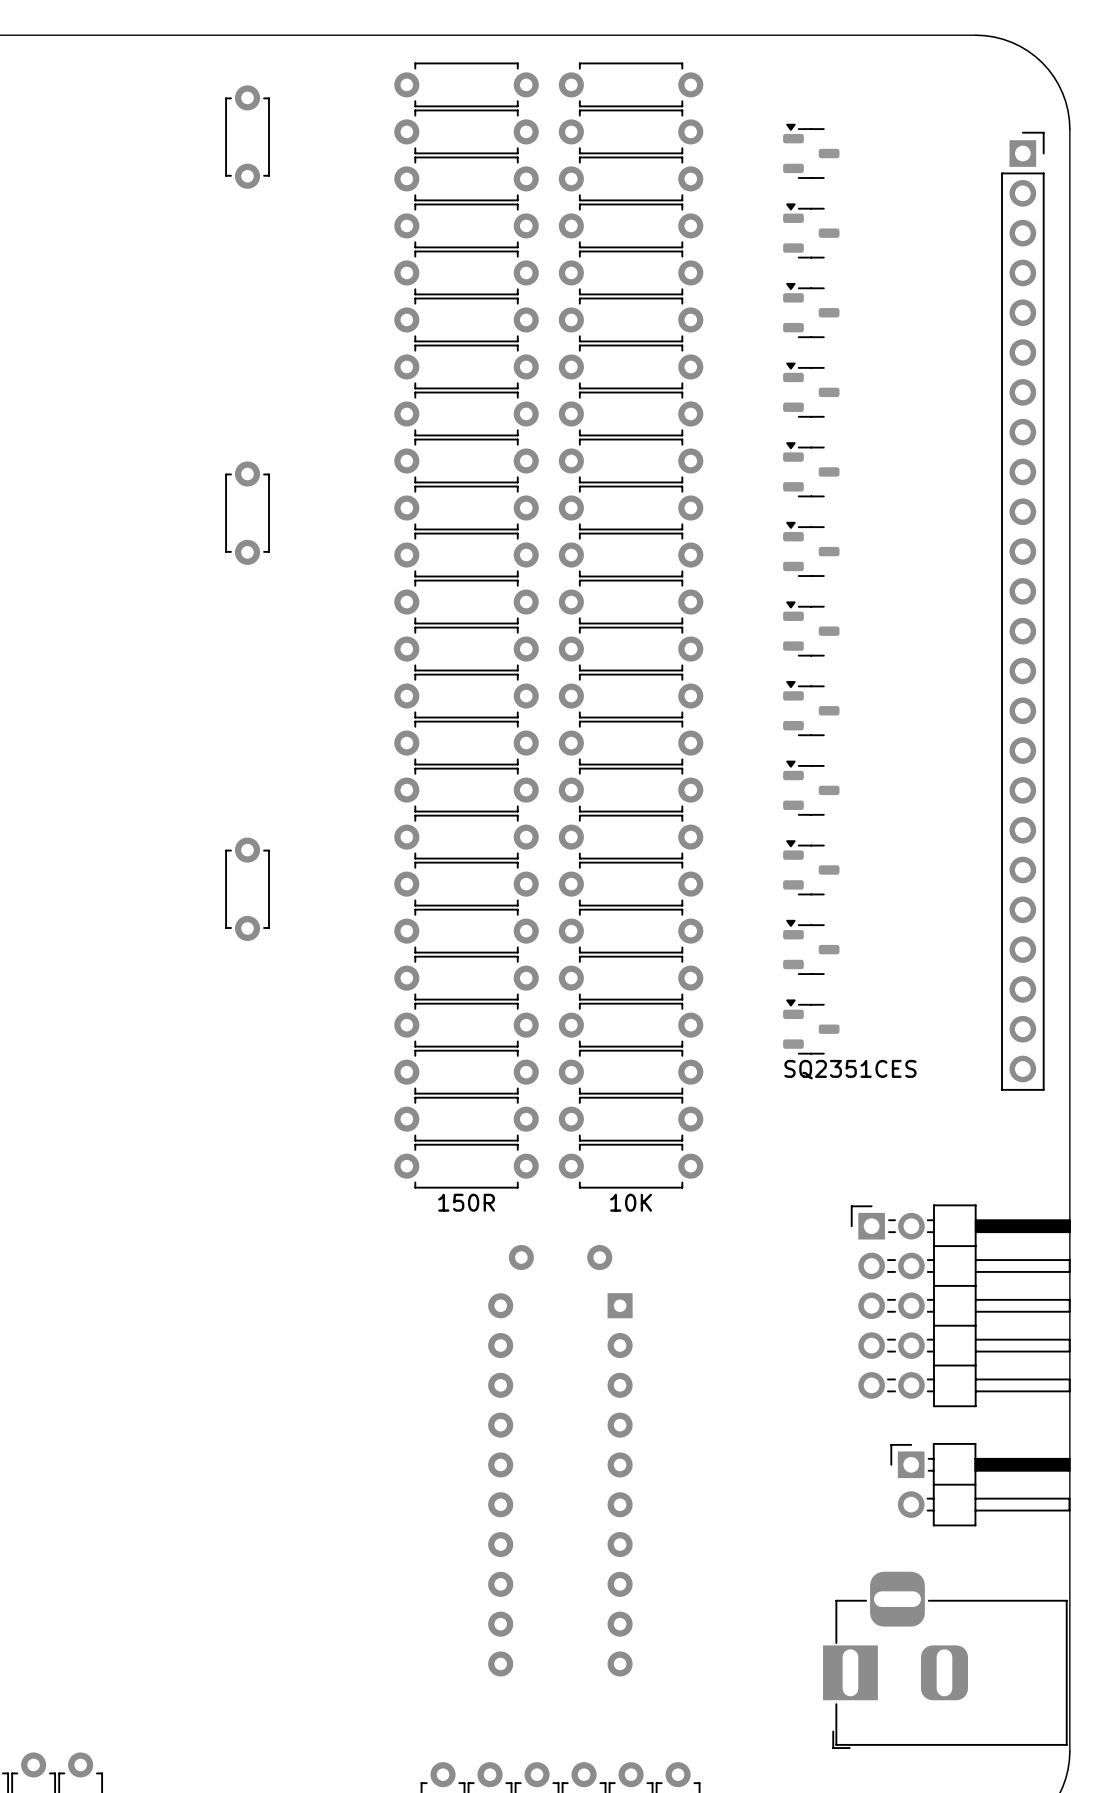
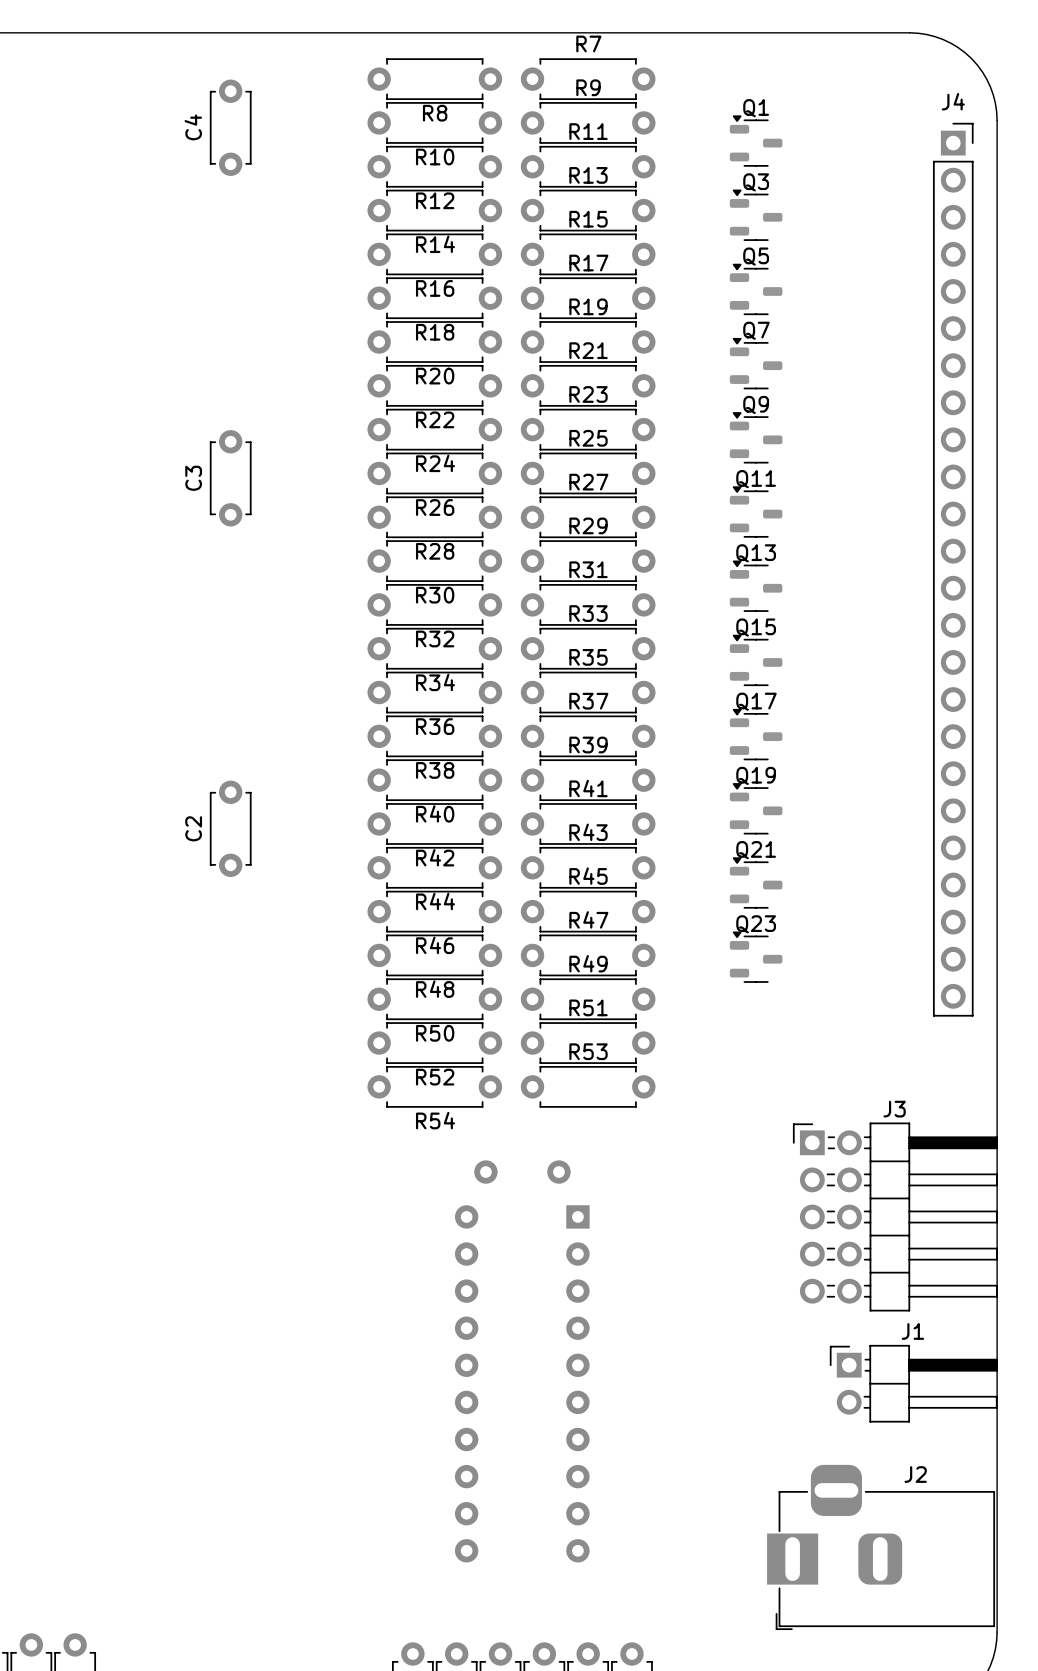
R7 name: none -> R7 (588, 43)
R9 name: none -> R9 (588, 87)
J4 name: none -> J4 (953, 101)
Q1 name: none -> Q1 (756, 108)
R8 name: none -> R8 (435, 113)
C4 name: none -> C4 (193, 127)
R11 name: none -> R11 (588, 131)
R10 name: none -> R10 (435, 157)
R13 name: none -> R13 (588, 175)
Q3 name: none -> Q3 (756, 182)
R12 name: none -> R12 (435, 200)
R15 name: none -> R15 (588, 219)
R14 name: none -> R14 (435, 244)
Q5 name: none -> Q5 (756, 256)
R17 name: none -> R17 (588, 263)
R16 name: none -> R16 (435, 288)
R19 name: none -> R19 (588, 306)
Q7 name: none -> Q7 (756, 330)
R18 name: none -> R18 (435, 332)
R21 name: none -> R21 (588, 350)
R20 name: none -> R20 (435, 376)
R23 name: none -> R23 (588, 394)
Q9 name: none -> Q9 (756, 404)
R22 name: none -> R22 (435, 419)
R25 name: none -> R25 (588, 438)
R24 name: none -> R24 (435, 463)
C3 name: none -> C3 (193, 478)
Q11 name: none -> Q11 (756, 479)
R27 name: none -> R27 (588, 482)
R26 name: none -> R26 (435, 507)
R29 name: none -> R29 (588, 525)
R28 name: none -> R28 (435, 551)
Q13 name: none -> Q13 (756, 553)
R31 name: none -> R31 (588, 569)
R30 name: none -> R30 (435, 595)
R33 name: none -> R33 (588, 613)
Q15 name: none -> Q15 (756, 627)
R32 name: none -> R32 (435, 638)
R35 name: none -> R35 (588, 657)
R34 name: none -> R34 (435, 682)
R37 name: none -> R37 (588, 701)
Q17 name: none -> Q17 (756, 701)
R36 name: none -> R36 (435, 726)
R39 name: none -> R39 (588, 745)
R38 name: none -> R38 (435, 770)
Q19 name: none -> Q19 (756, 775)
R41 name: none -> R41 (588, 788)
R40 name: none -> R40 (435, 813)
C2 name: none -> C2 (193, 828)
R43 name: none -> R43 (588, 832)
Q21 name: none -> Q21 (756, 850)
R42 name: none -> R42 (435, 857)
R45 name: none -> R45 (588, 876)
R44 name: none -> R44 (435, 901)
R47 name: none -> R47 (588, 919)
Q23 name: none -> Q23 (756, 924)
R46 name: none -> R46 (435, 945)
R49 name: none -> R49 (588, 963)
R48 name: none -> R48 (435, 989)
Q23 value: SQ2351CES (850, 1069) -> none
R51 name: none -> R51 (588, 1007)
R50 name: none -> R50 (435, 1033)
R53 name: none -> R53 (588, 1051)
R52 name: none -> R52 (435, 1077)
J3 name: none -> J3 (894, 1109)
R54 value: 150R (466, 1202) -> none
R54 name: none -> R54 (435, 1120)
R53 value: 10K (631, 1202) -> none
J1 name: none -> J1 (912, 1331)
J2 name: none -> J2 (915, 1474)

